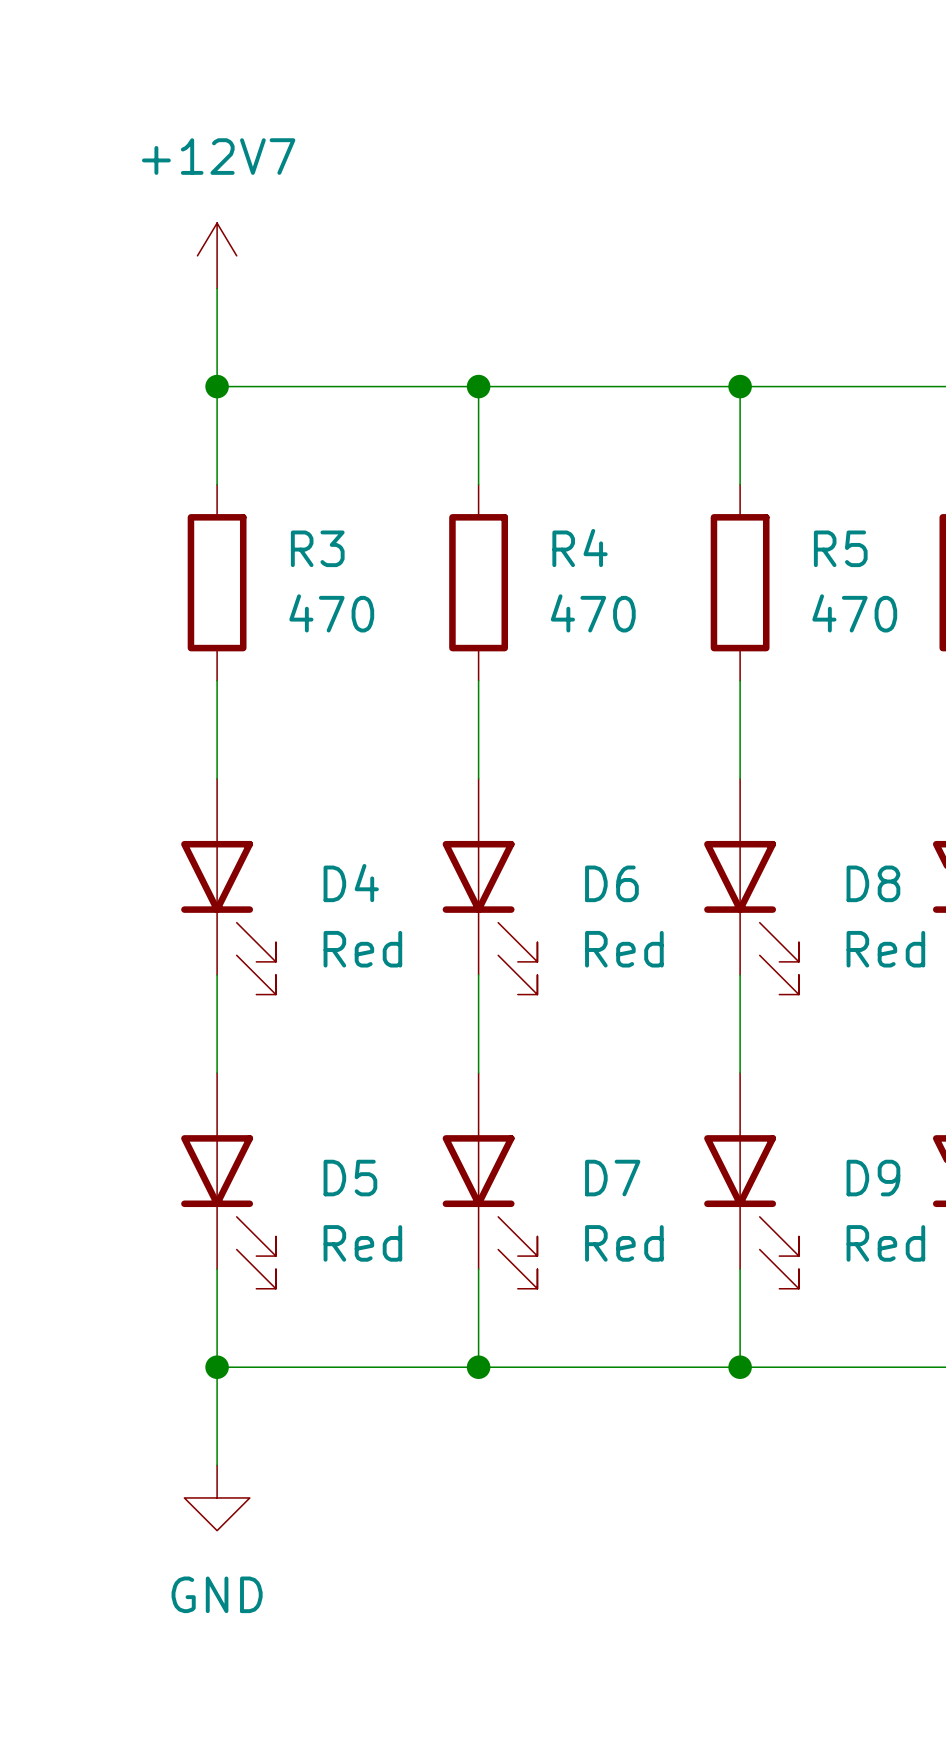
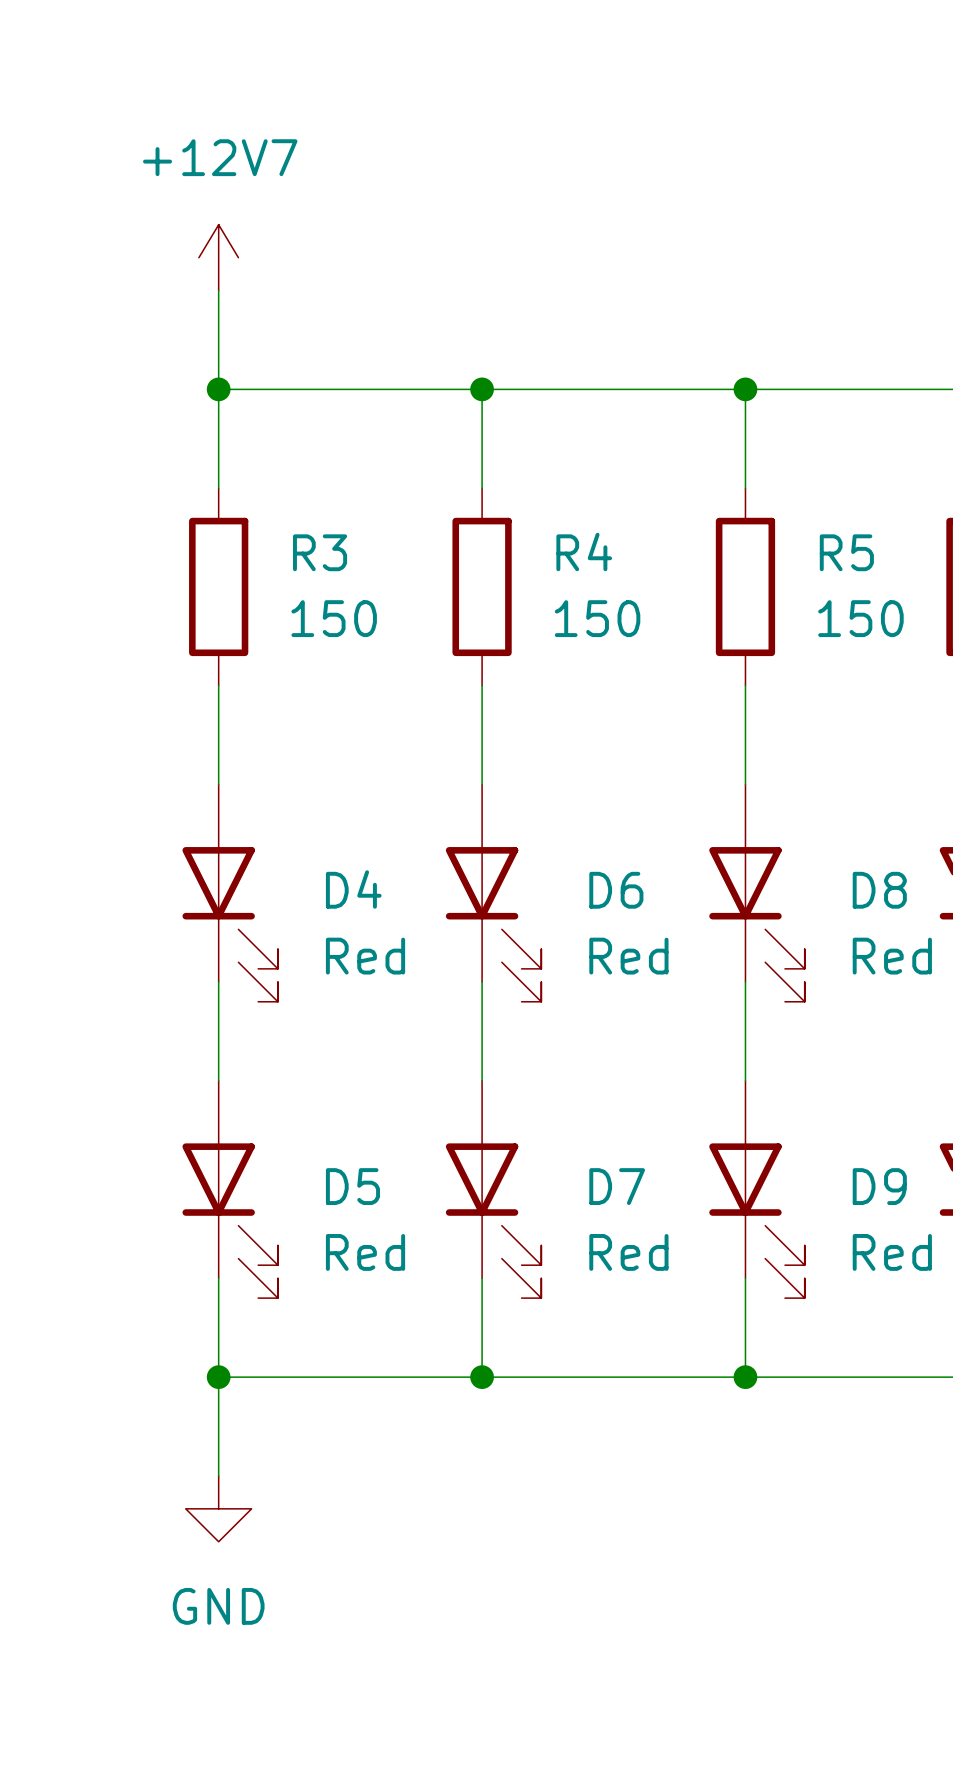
R3 value: 470 (331, 613) -> 150 (334, 618)
R4 value: 470 (593, 613) -> 150 (597, 618)
R5 value: 470 (854, 613) -> 150 (860, 618)

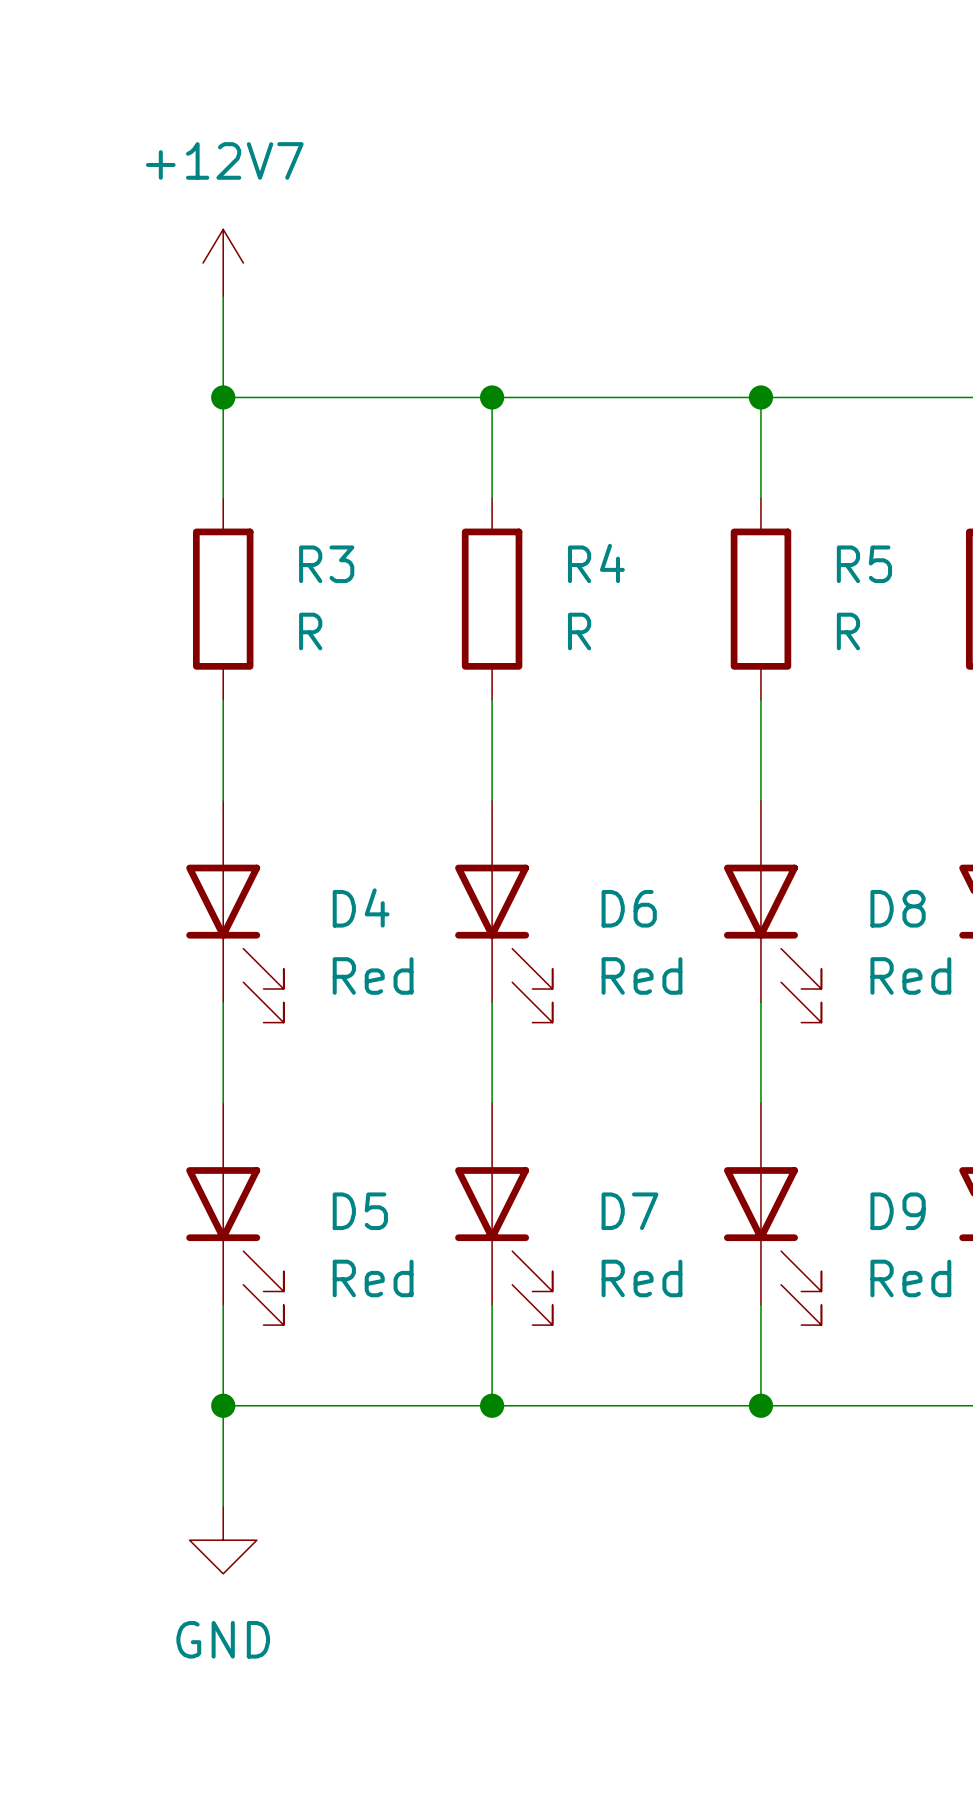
R3 value: 150 (334, 618) -> R (310, 631)
R4 value: 150 (597, 618) -> R (579, 631)
R5 value: 150 (860, 618) -> R (848, 631)

